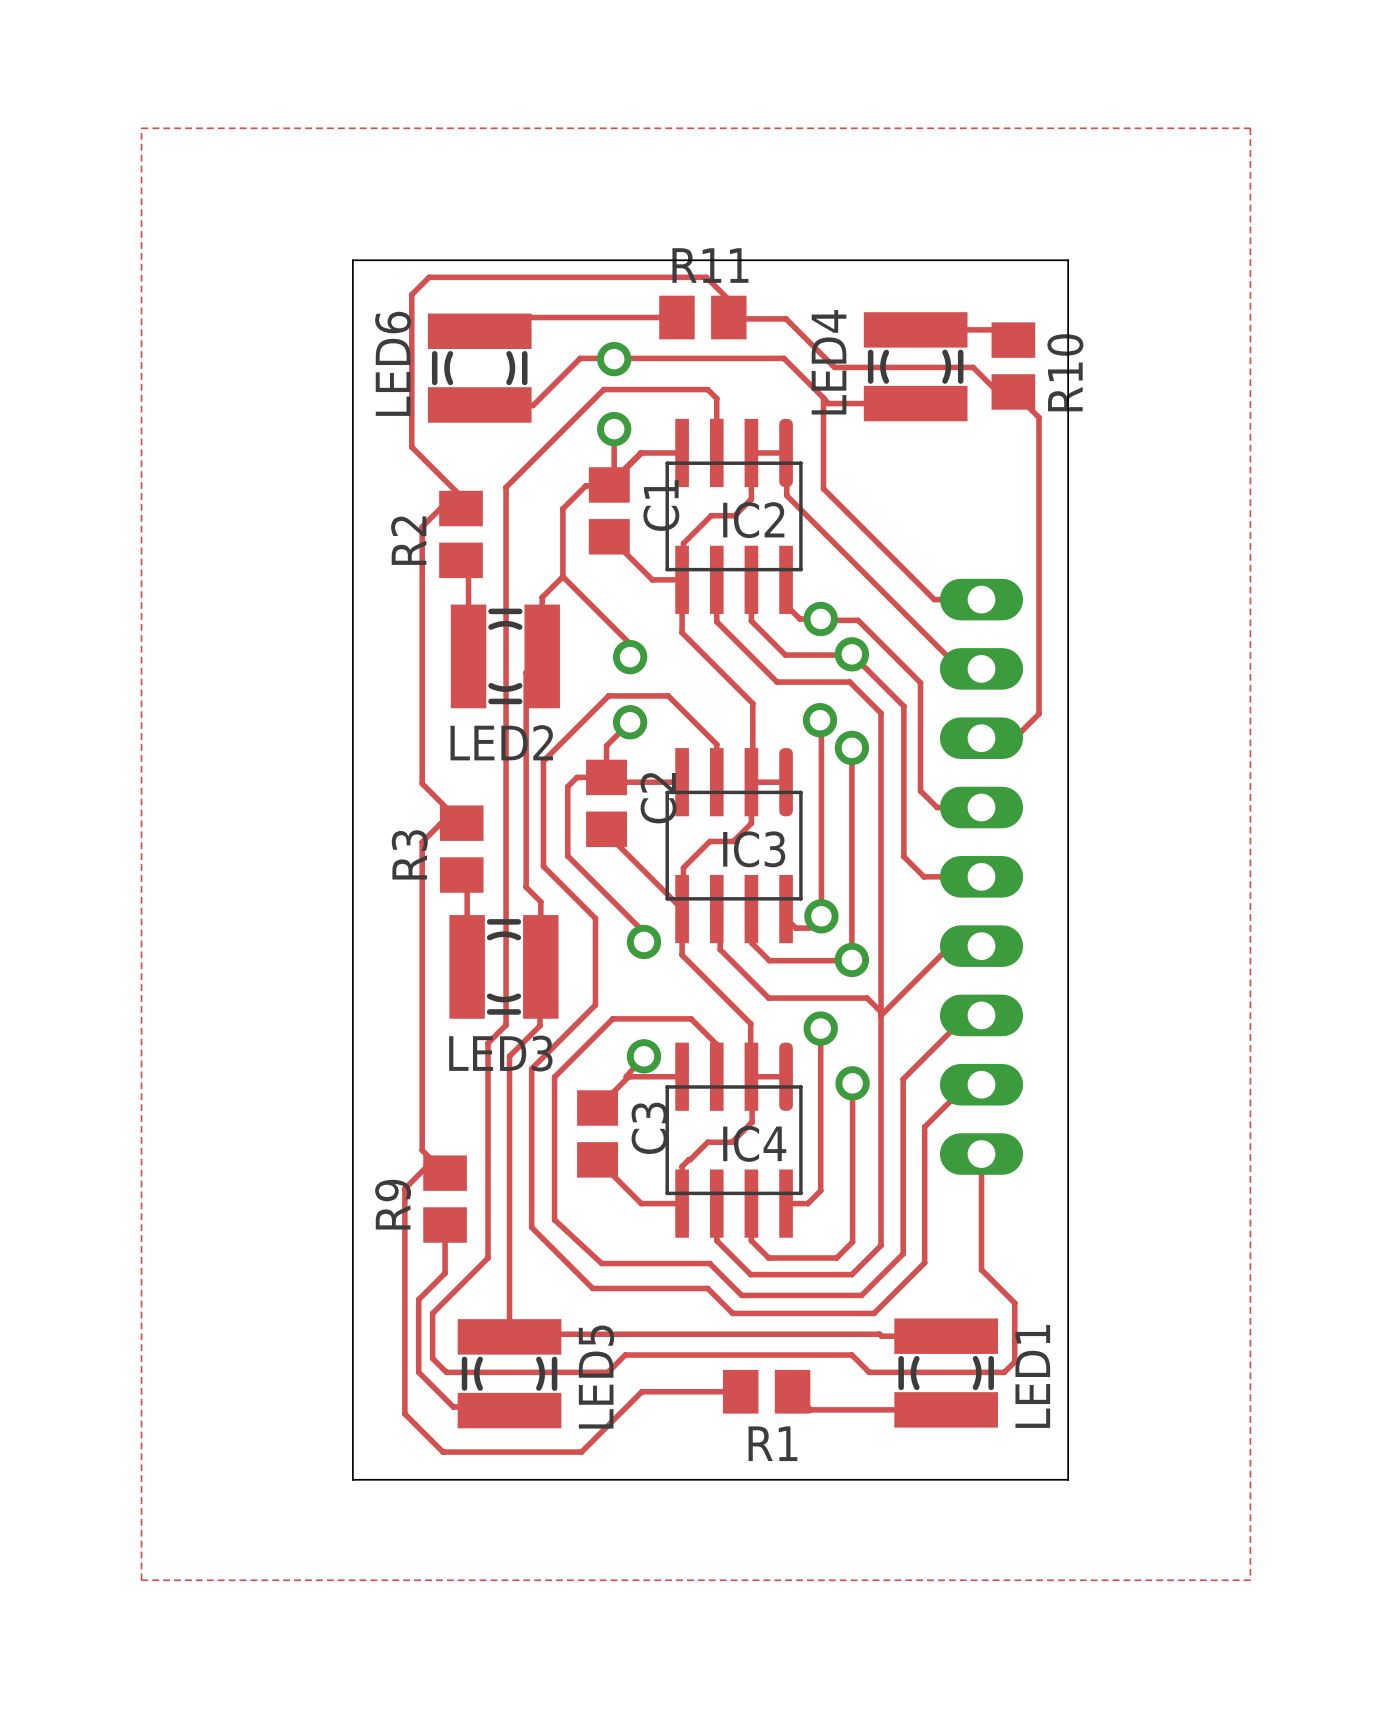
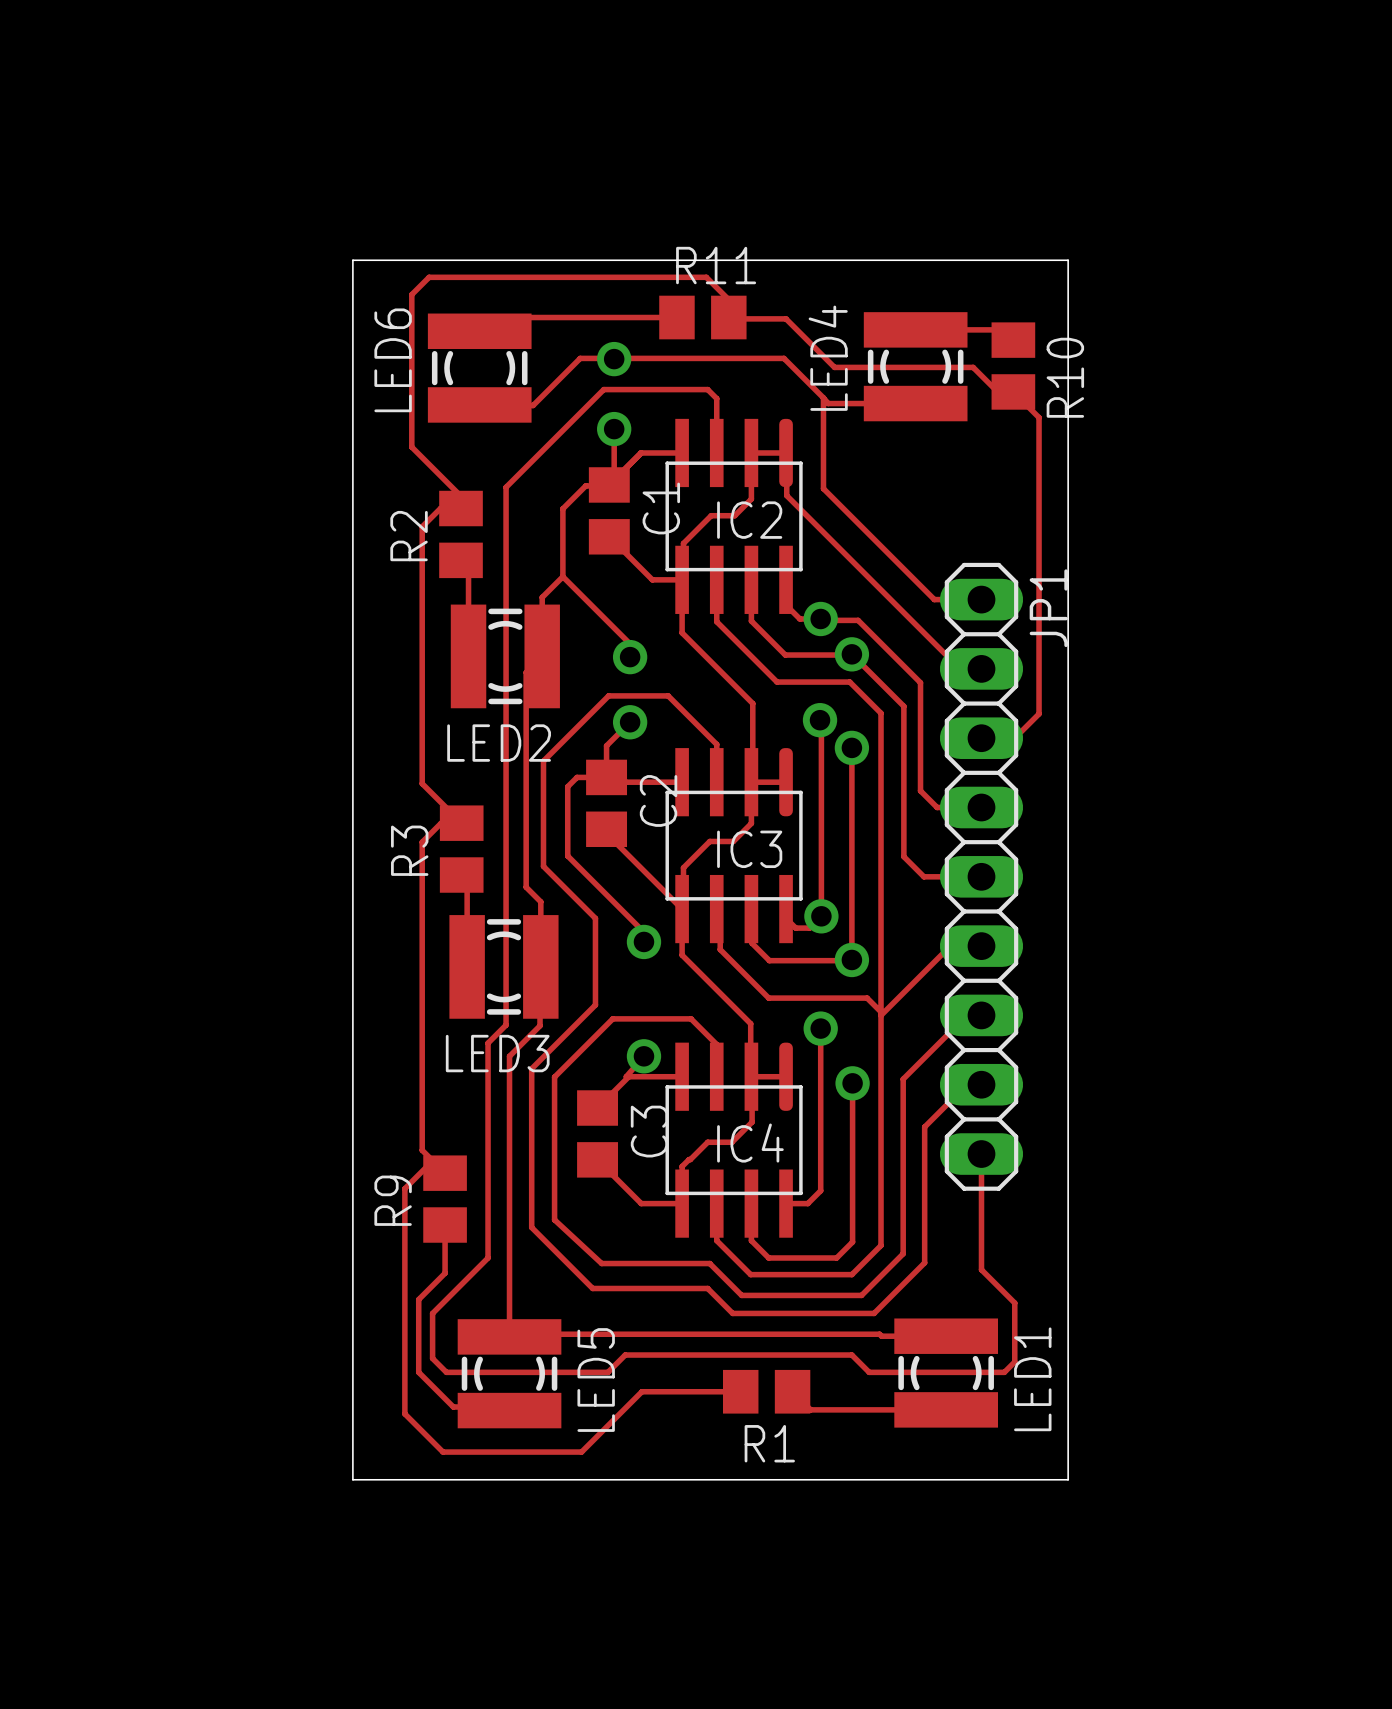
zone outline: (141, 128) (1250, 128) (1250, 1580) (141, 1580) (141, 128) -> none
JP1 side: bottom (981, 876) -> top (981, 876)

